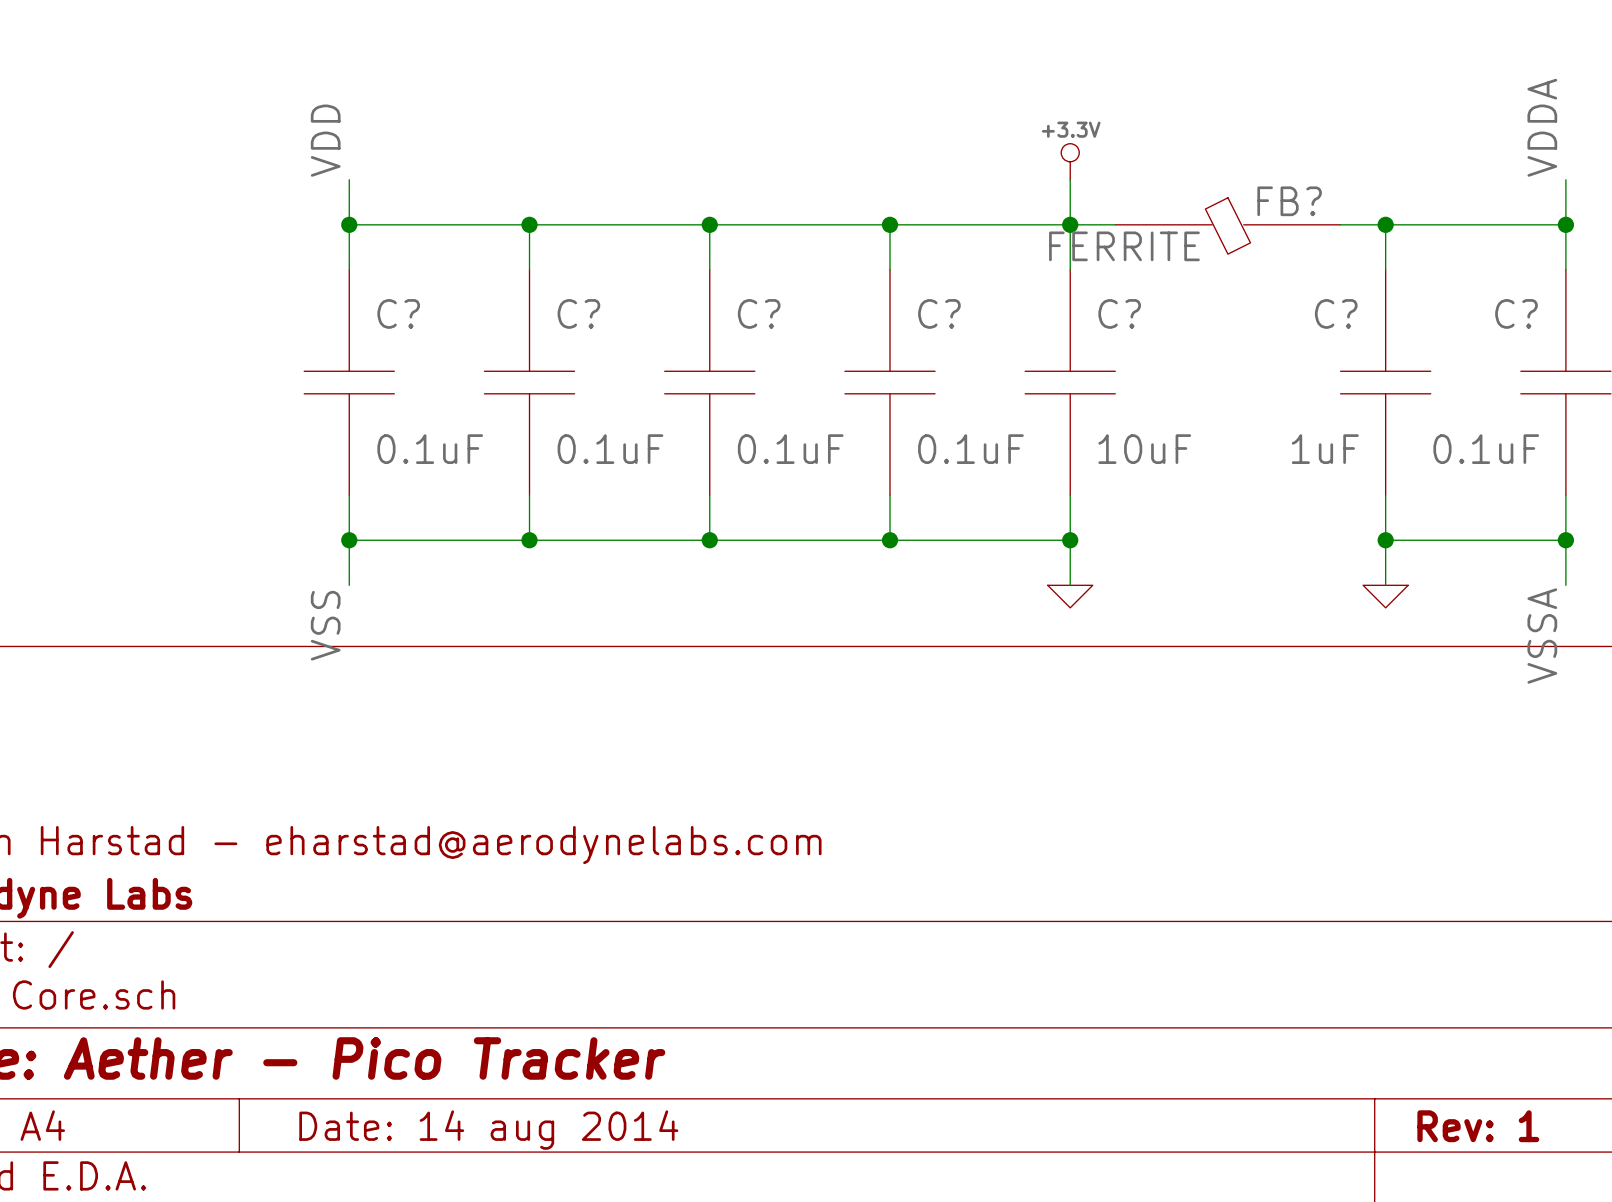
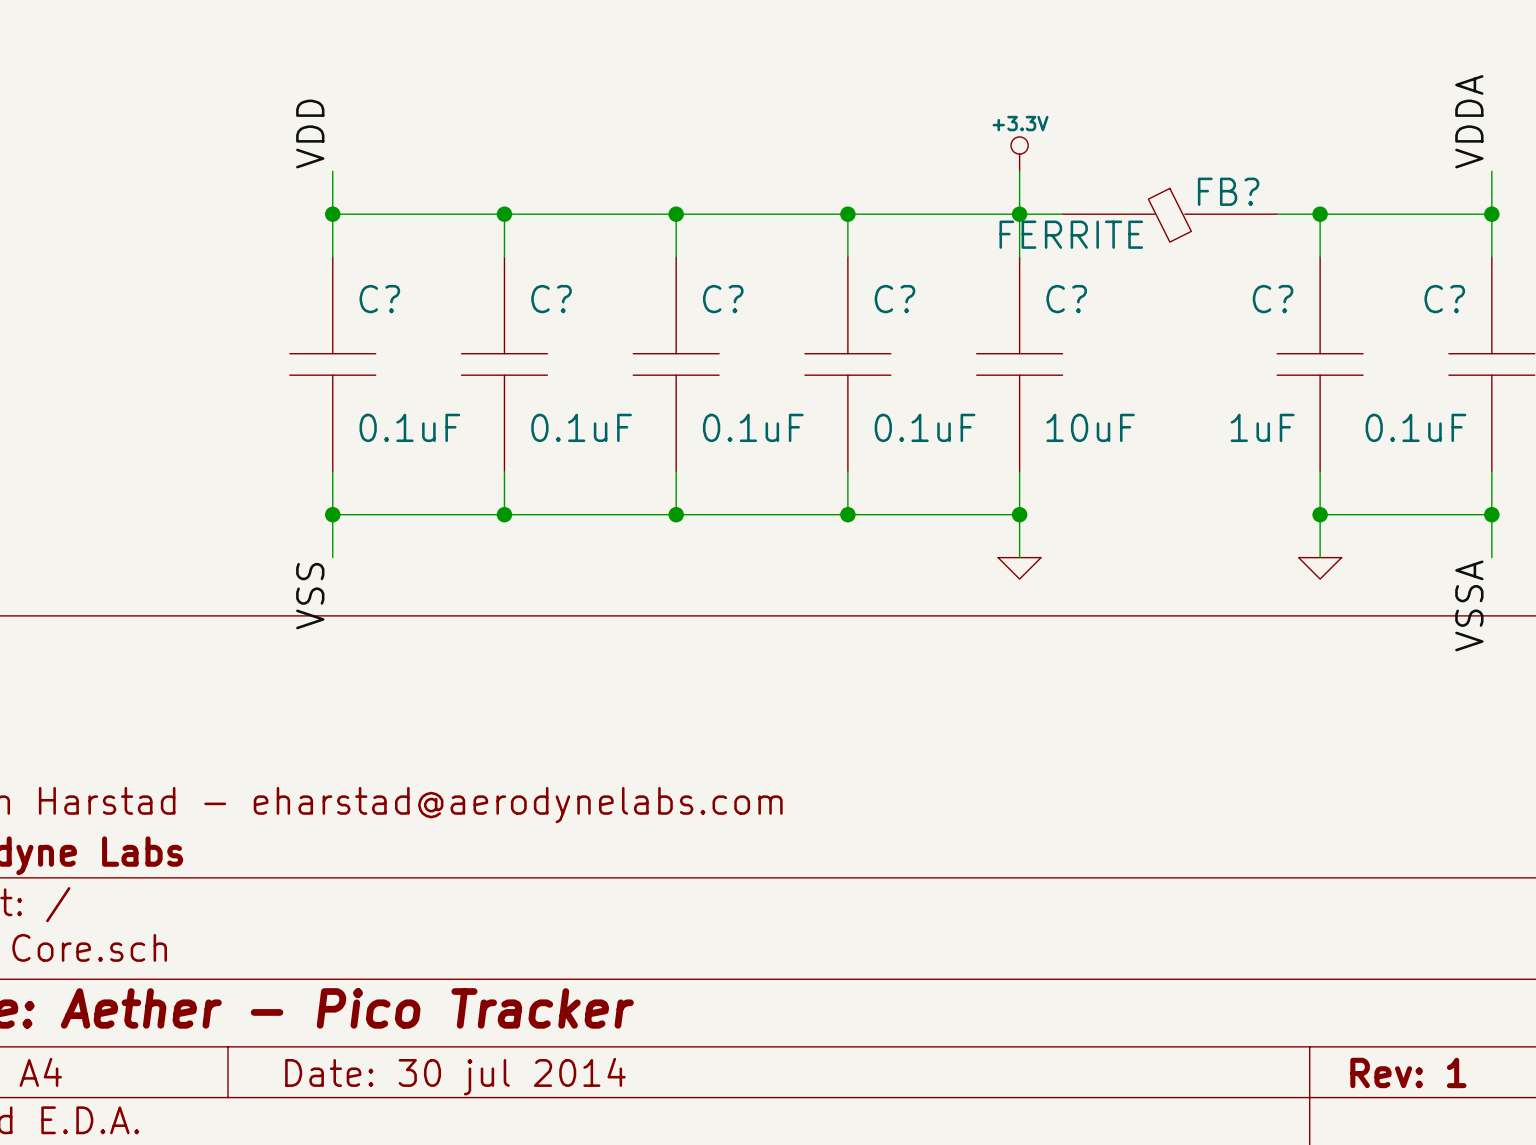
title block: Date: 14 aug 2014 (488, 1130) -> Date: 30 jul 2014 (455, 1076)

